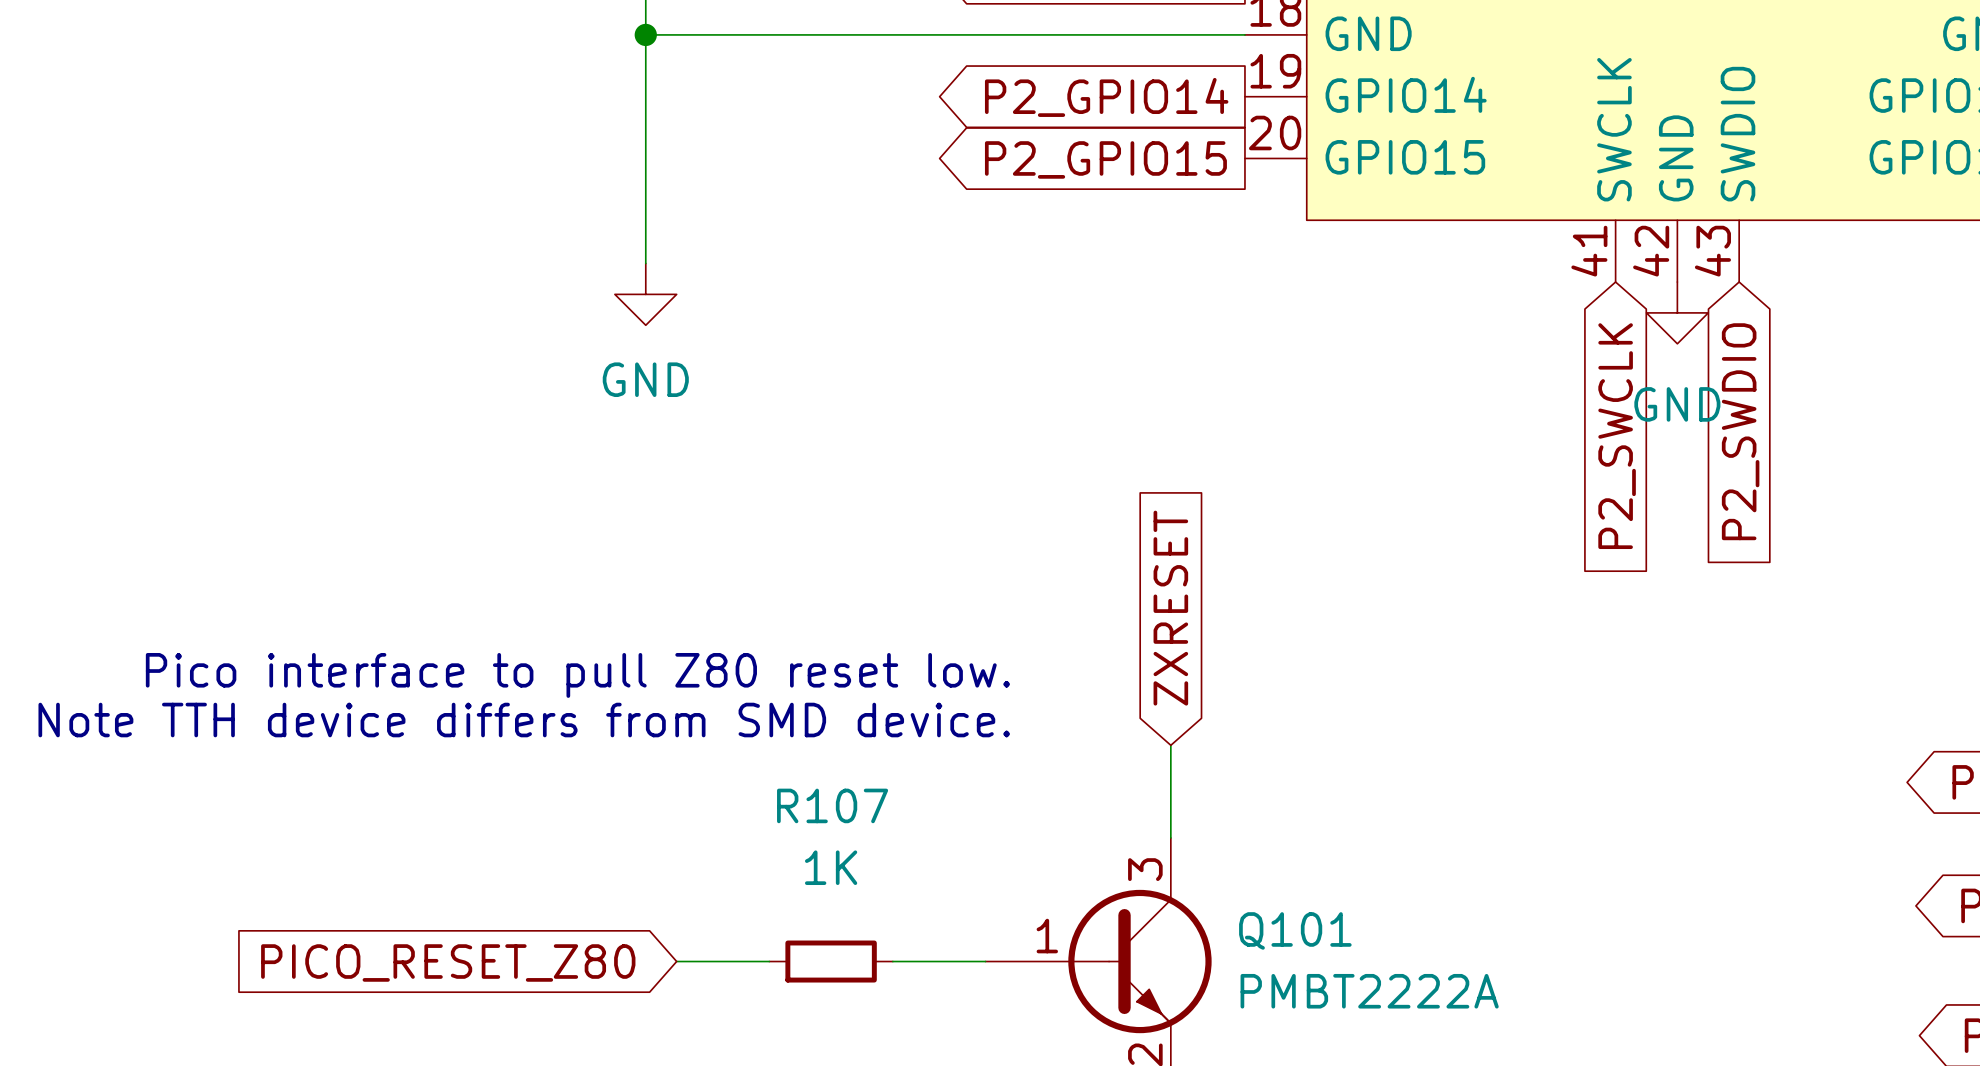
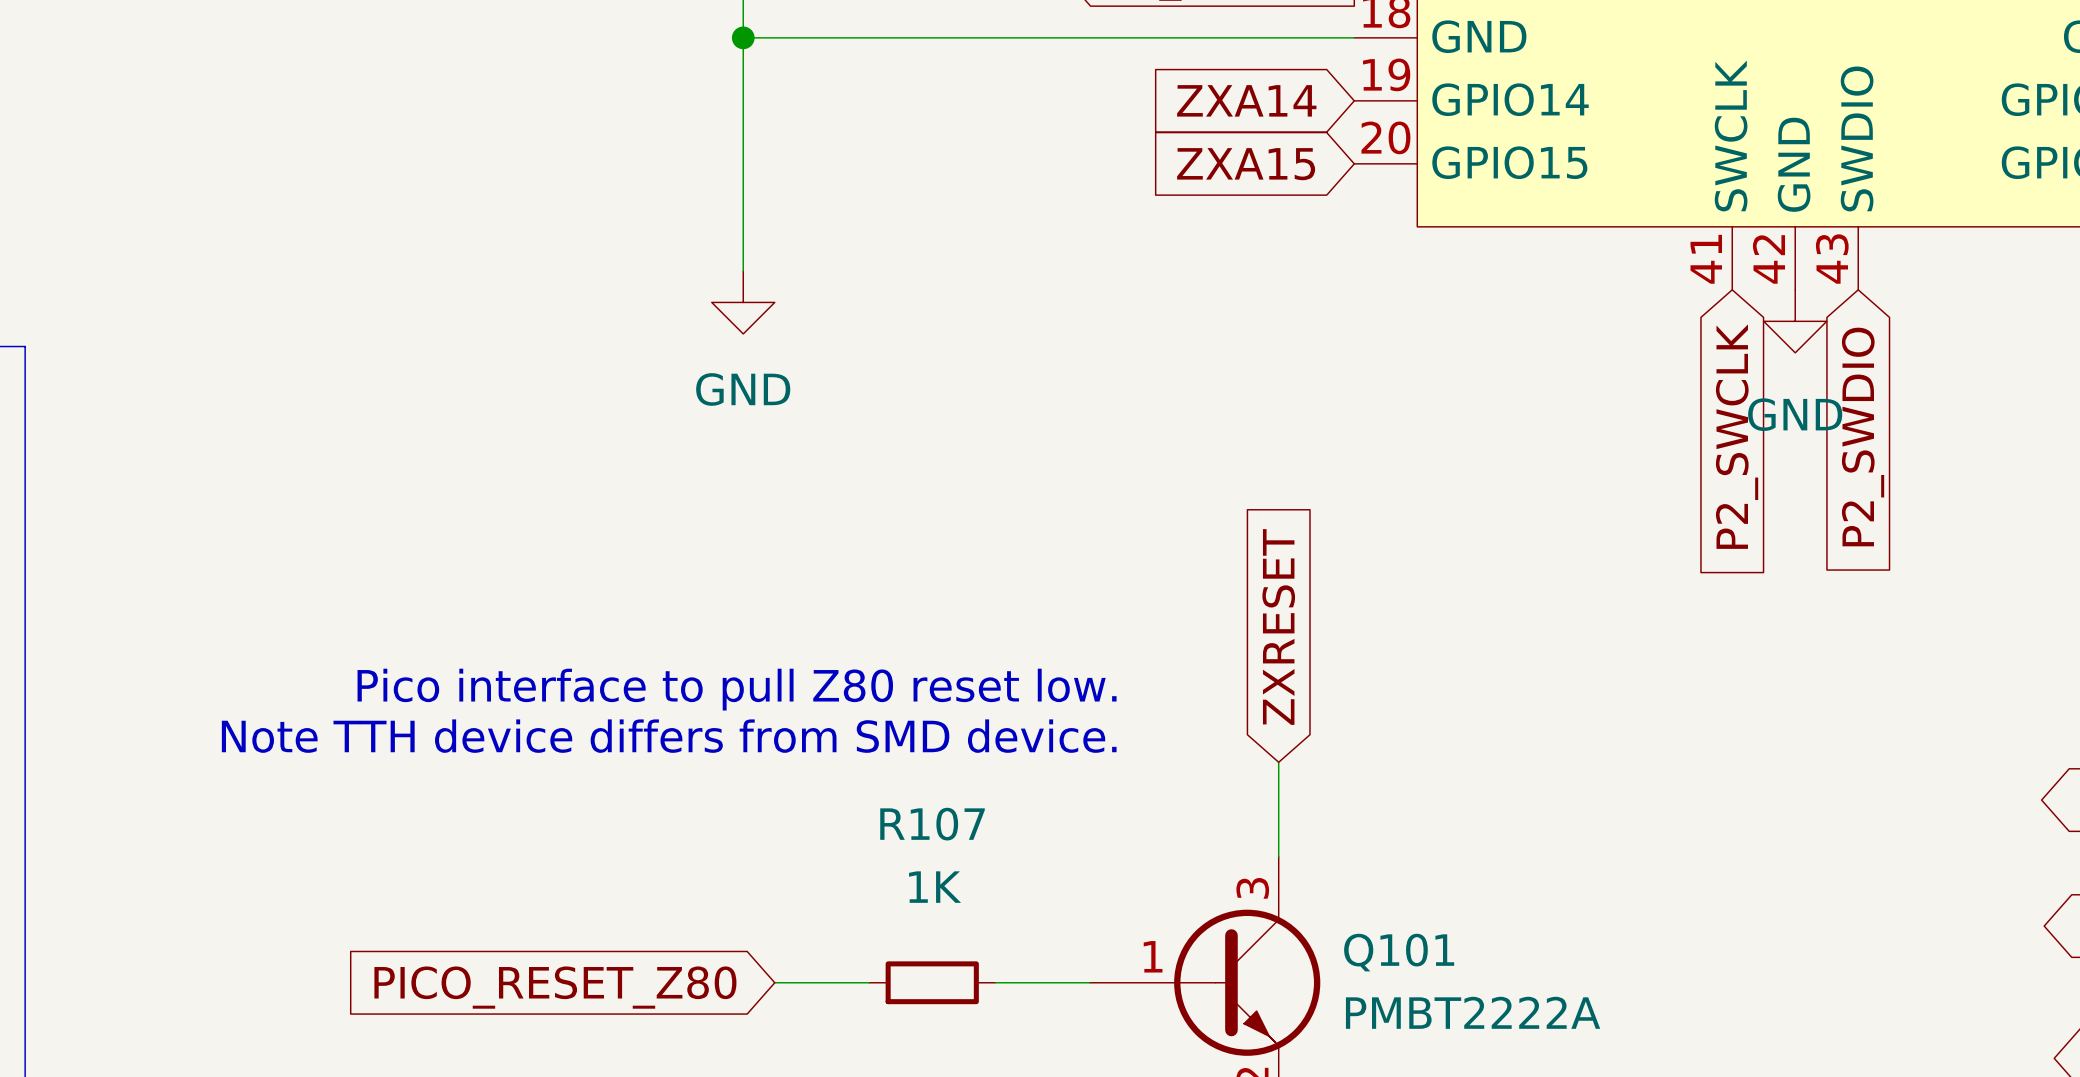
global label shape: output (1106, 97) -> input (1246, 100)
global label: P2_GPIO14 (1106, 97) -> ZXA14 (1246, 100)
global label shape: output (1105, 159) -> input (1246, 164)
global label: P2_GPIO15 (1105, 159) -> ZXA15 (1246, 164)

